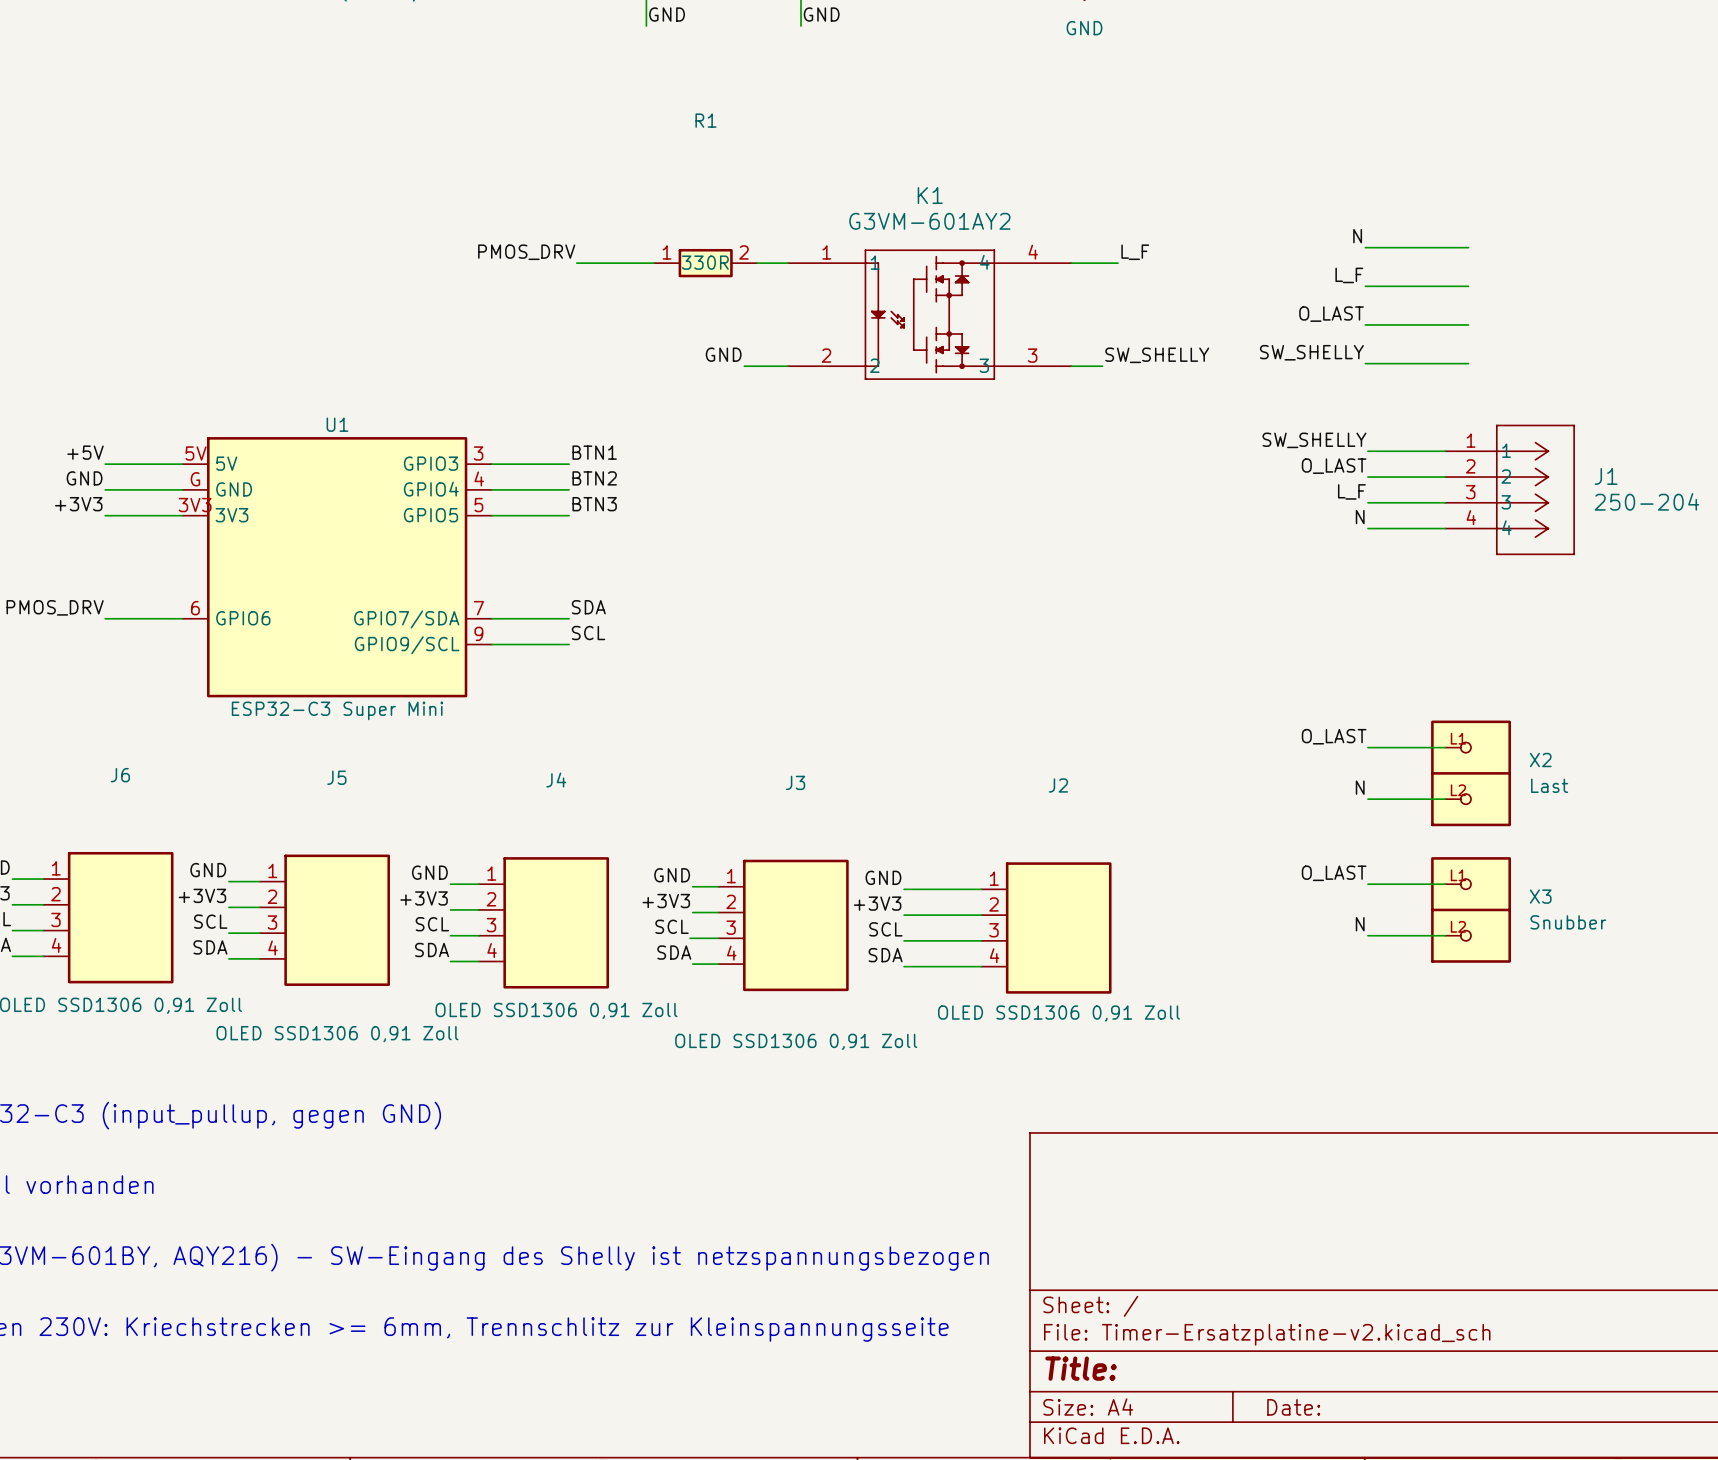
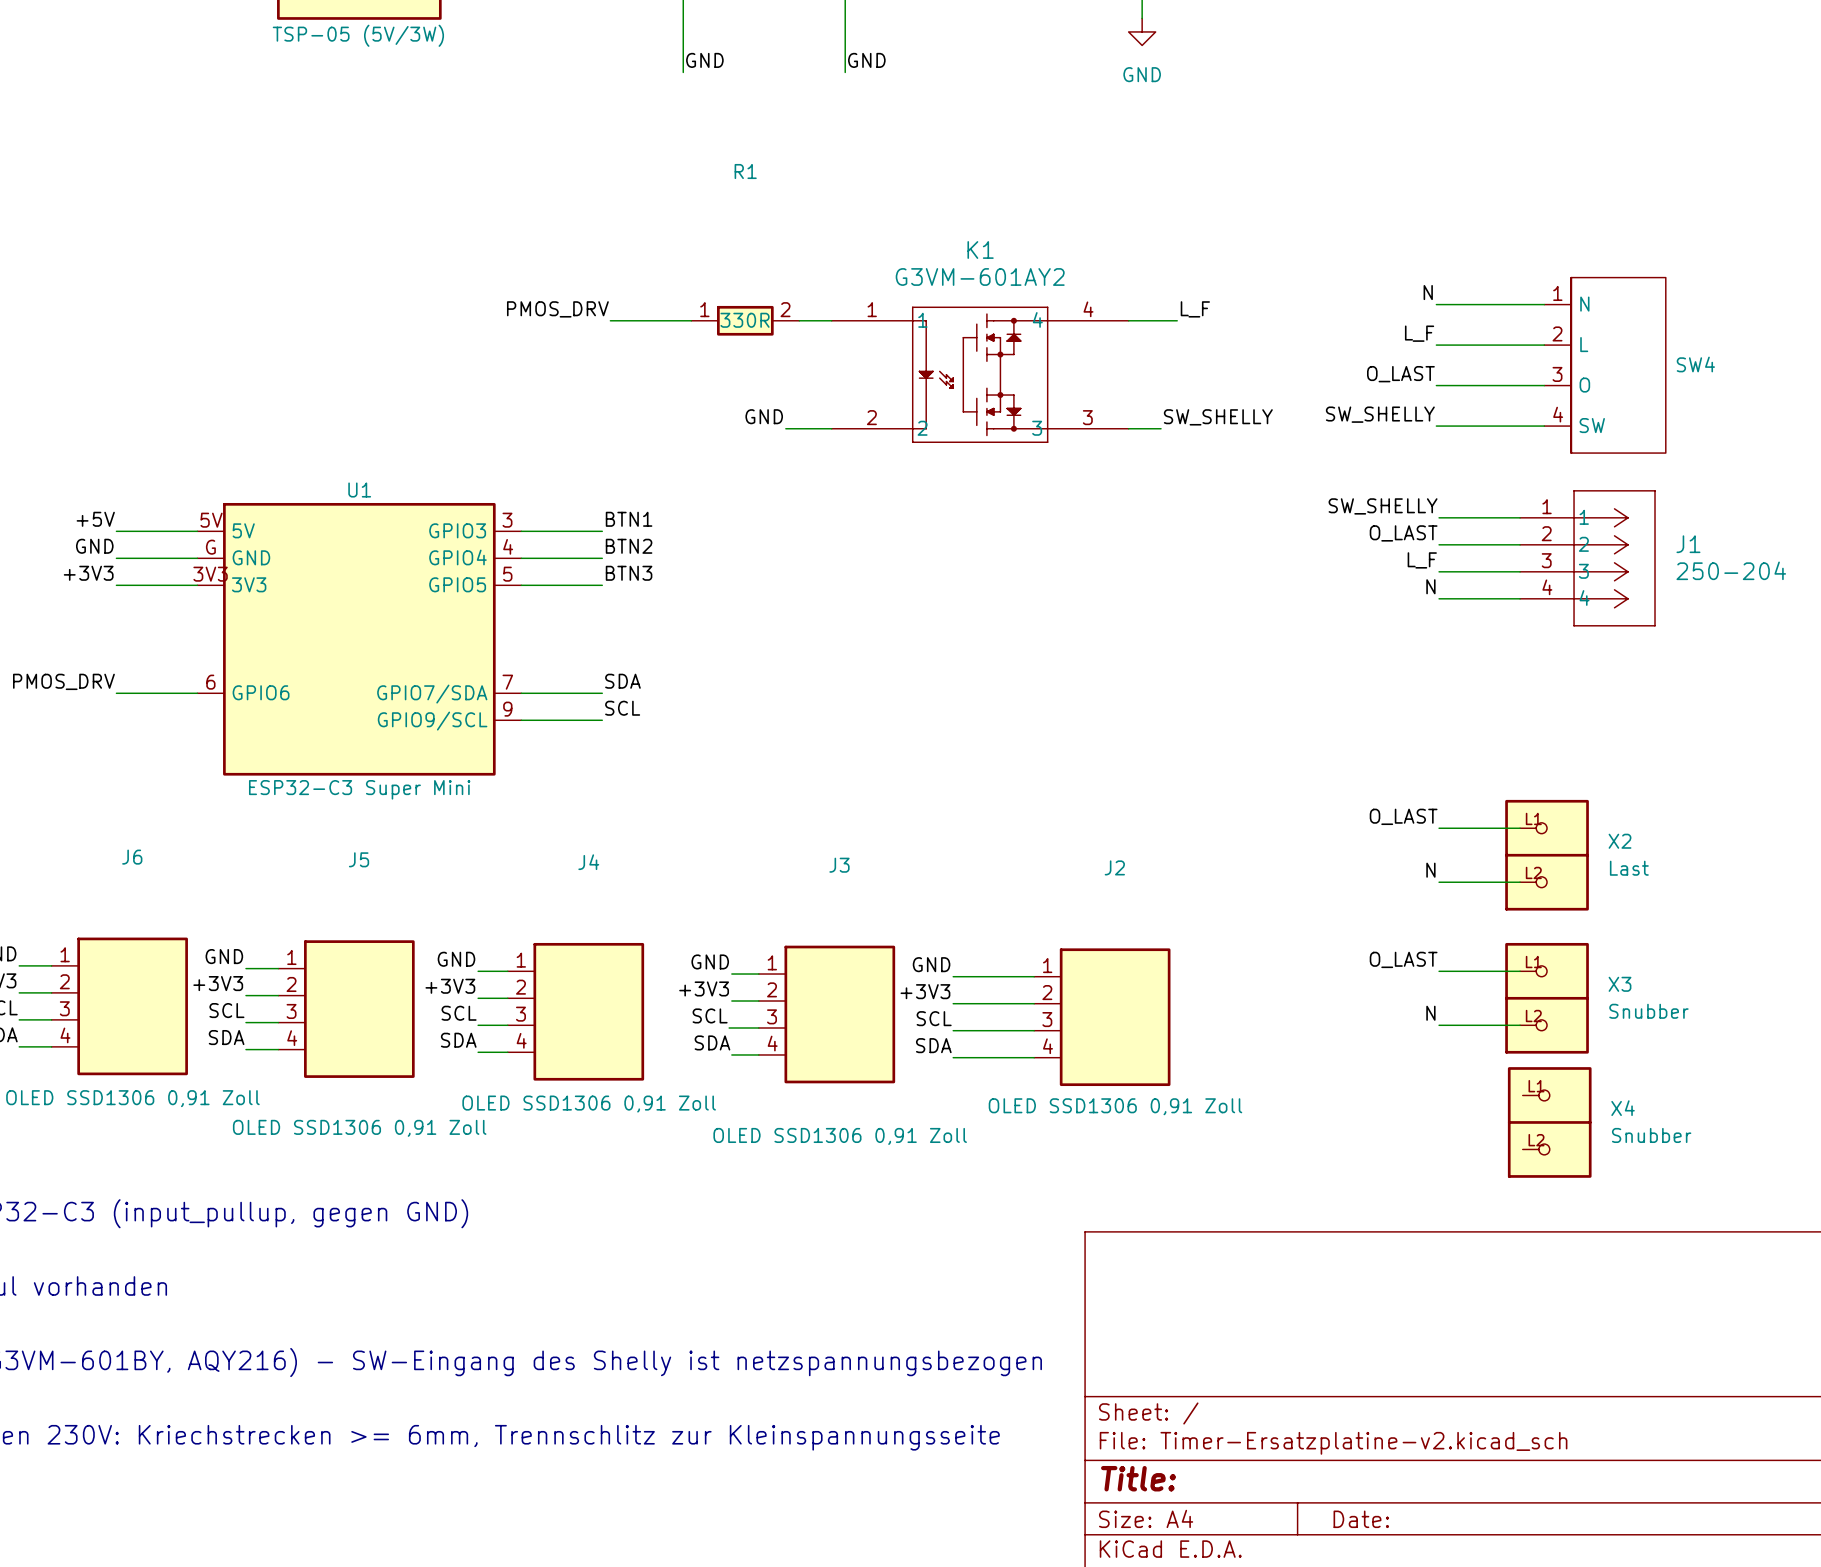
SW4: none -> (1605, 365)
X4: none -> Snubber (1549, 1122)

